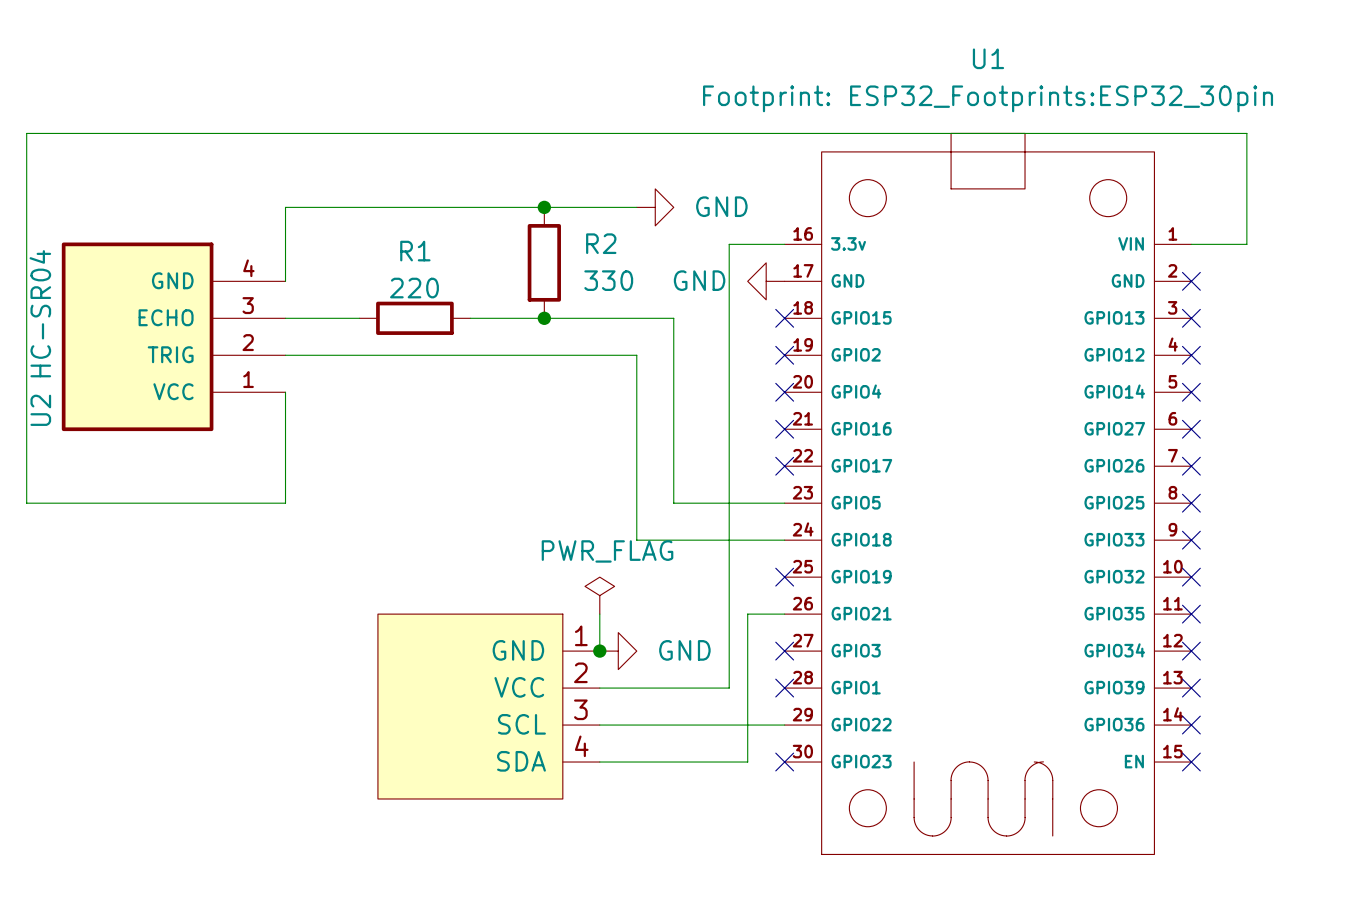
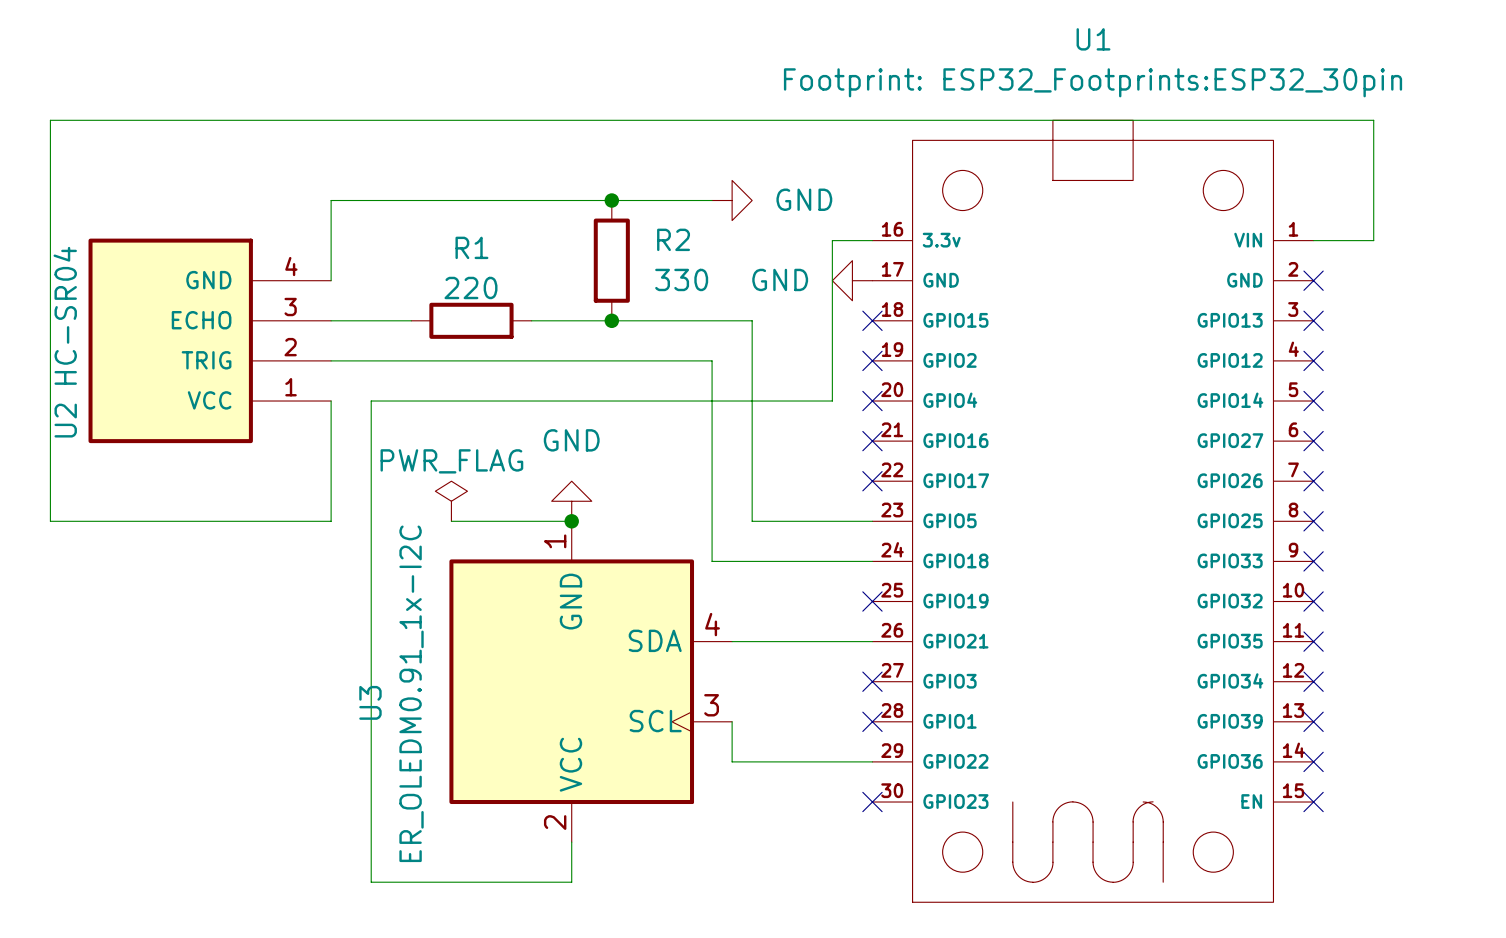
wire: (747, 244) (729, 244) (729, 688) (599, 688) -> (832, 240) (832, 401) (371, 401) (371, 882) (571, 882) (571, 842)
wire: none -> (451, 521) (571, 521)
junction: none -> (571, 521)
power symbol text position: PWR_FLAG (607, 551) -> PWR_FLAG (451, 461)
power symbol position: PWR_FLAG (599, 595) -> PWR_FLAG (451, 501)
wire: (747, 614) (747, 762) (599, 762) -> (832, 641) (732, 641)
U3: none -> ER_OLEDM0.91_1x-I2C (590, 681)
junction: (599, 651) -> none
power symbol rotation: 0° (618, 651) -> 90° counterclockwise (571, 501)
power symbol position: GND (618, 651) -> GND (571, 501)
part: (488, 706) -> none
wire: (599, 725) (655, 725) -> (732, 721) (732, 761)

